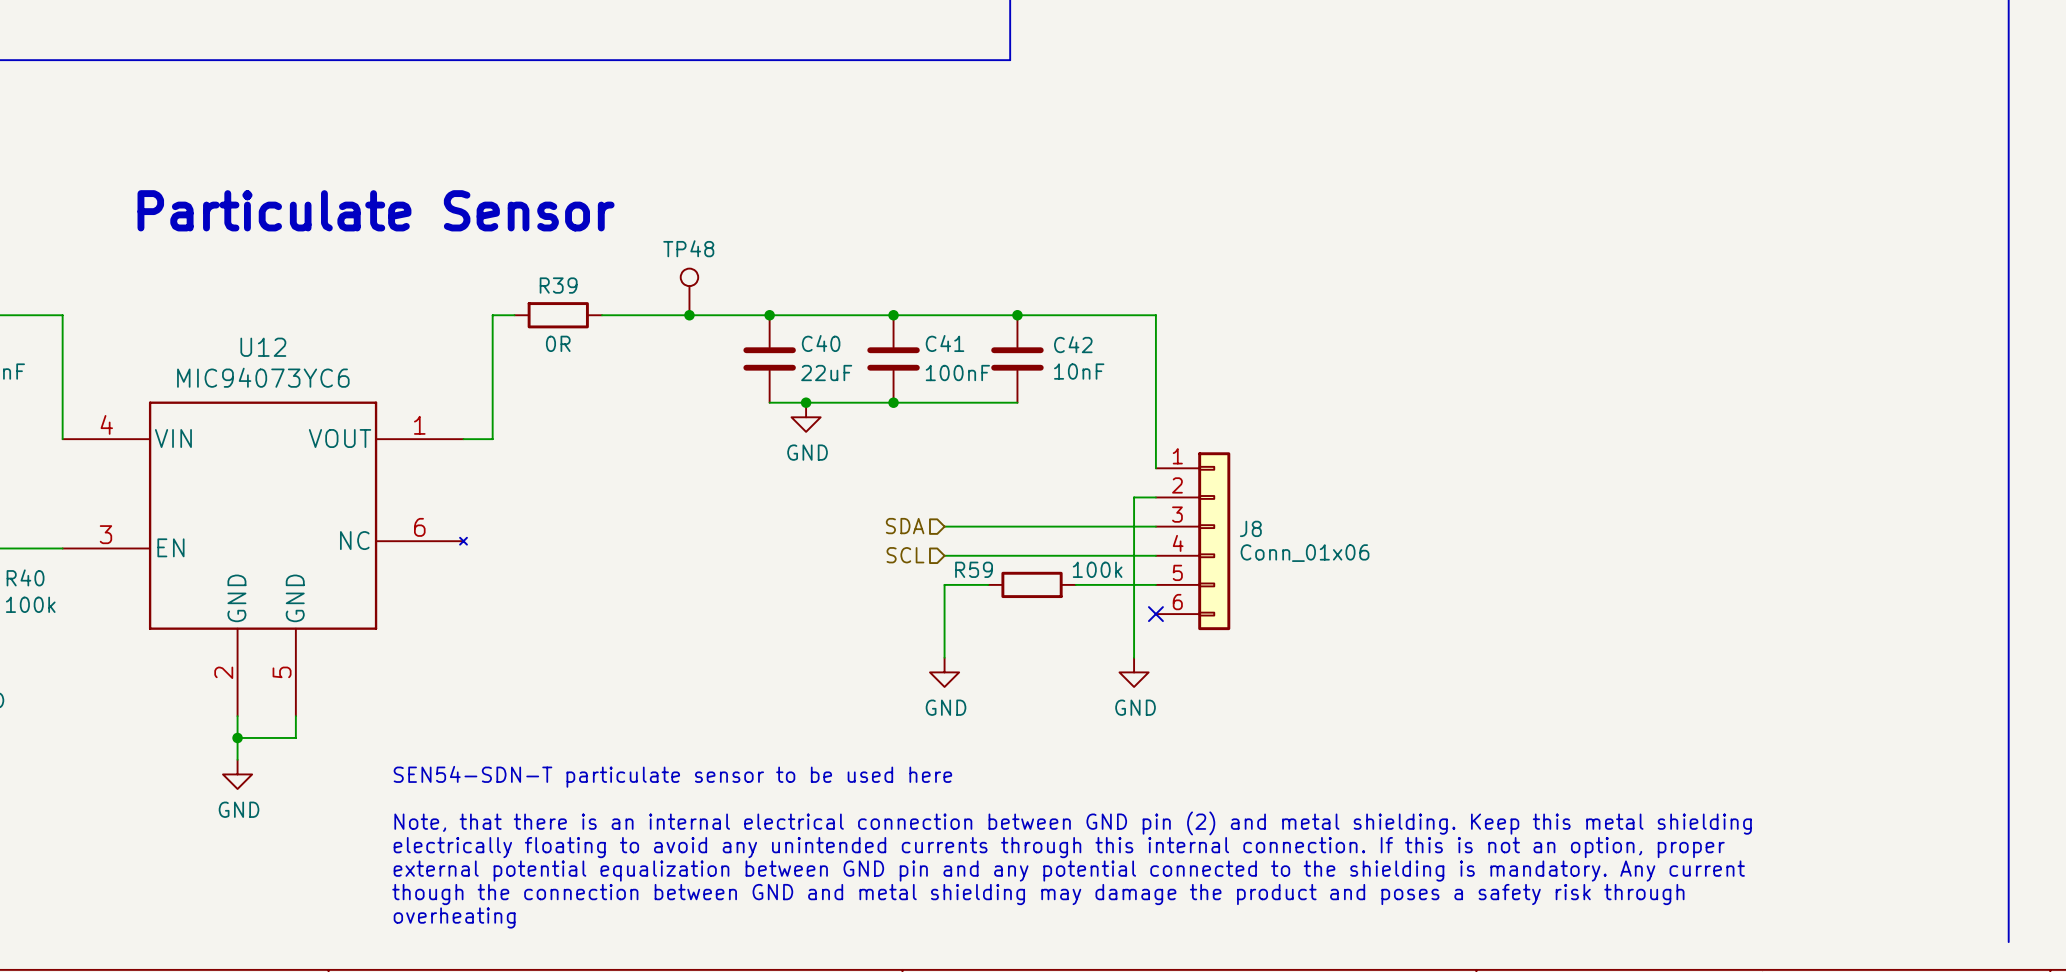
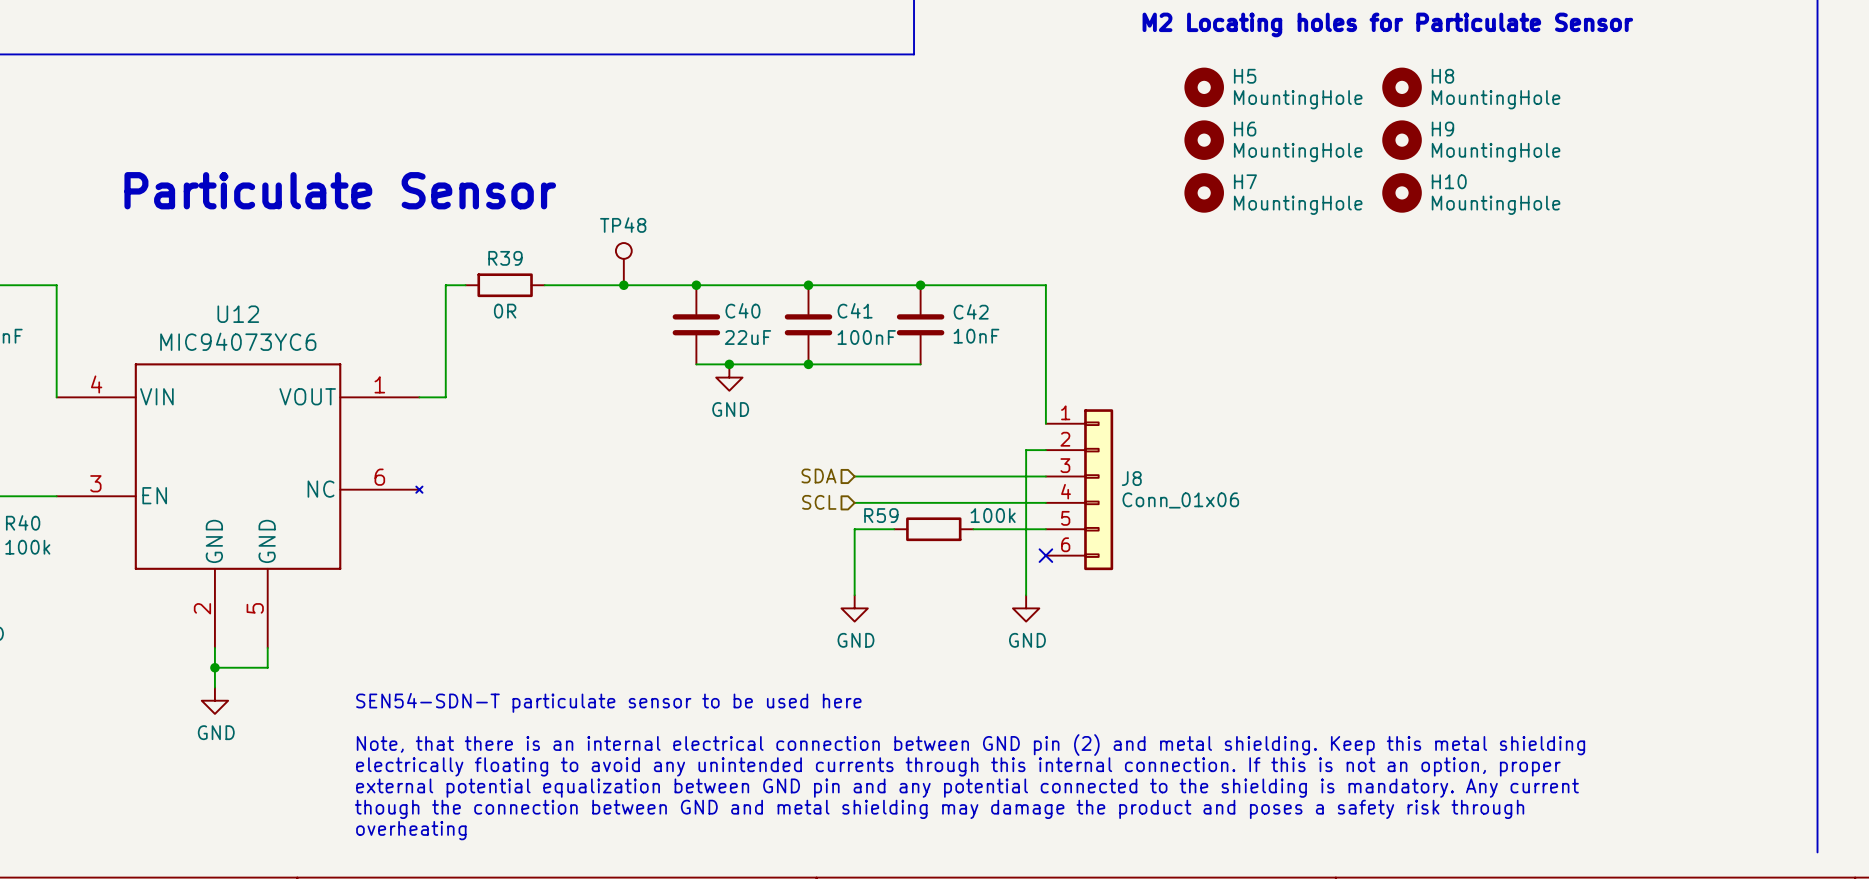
text: none -> M2 Locating holes for Particulate Sensor (1387, 24)
H5: none -> MountingHole (1204, 87)
H8: none -> MountingHole (1402, 87)
H6: none -> MountingHole (1204, 140)
H9: none -> MountingHole (1402, 140)
H7: none -> MountingHole (1204, 192)
H10: none -> MountingHole (1402, 192)

